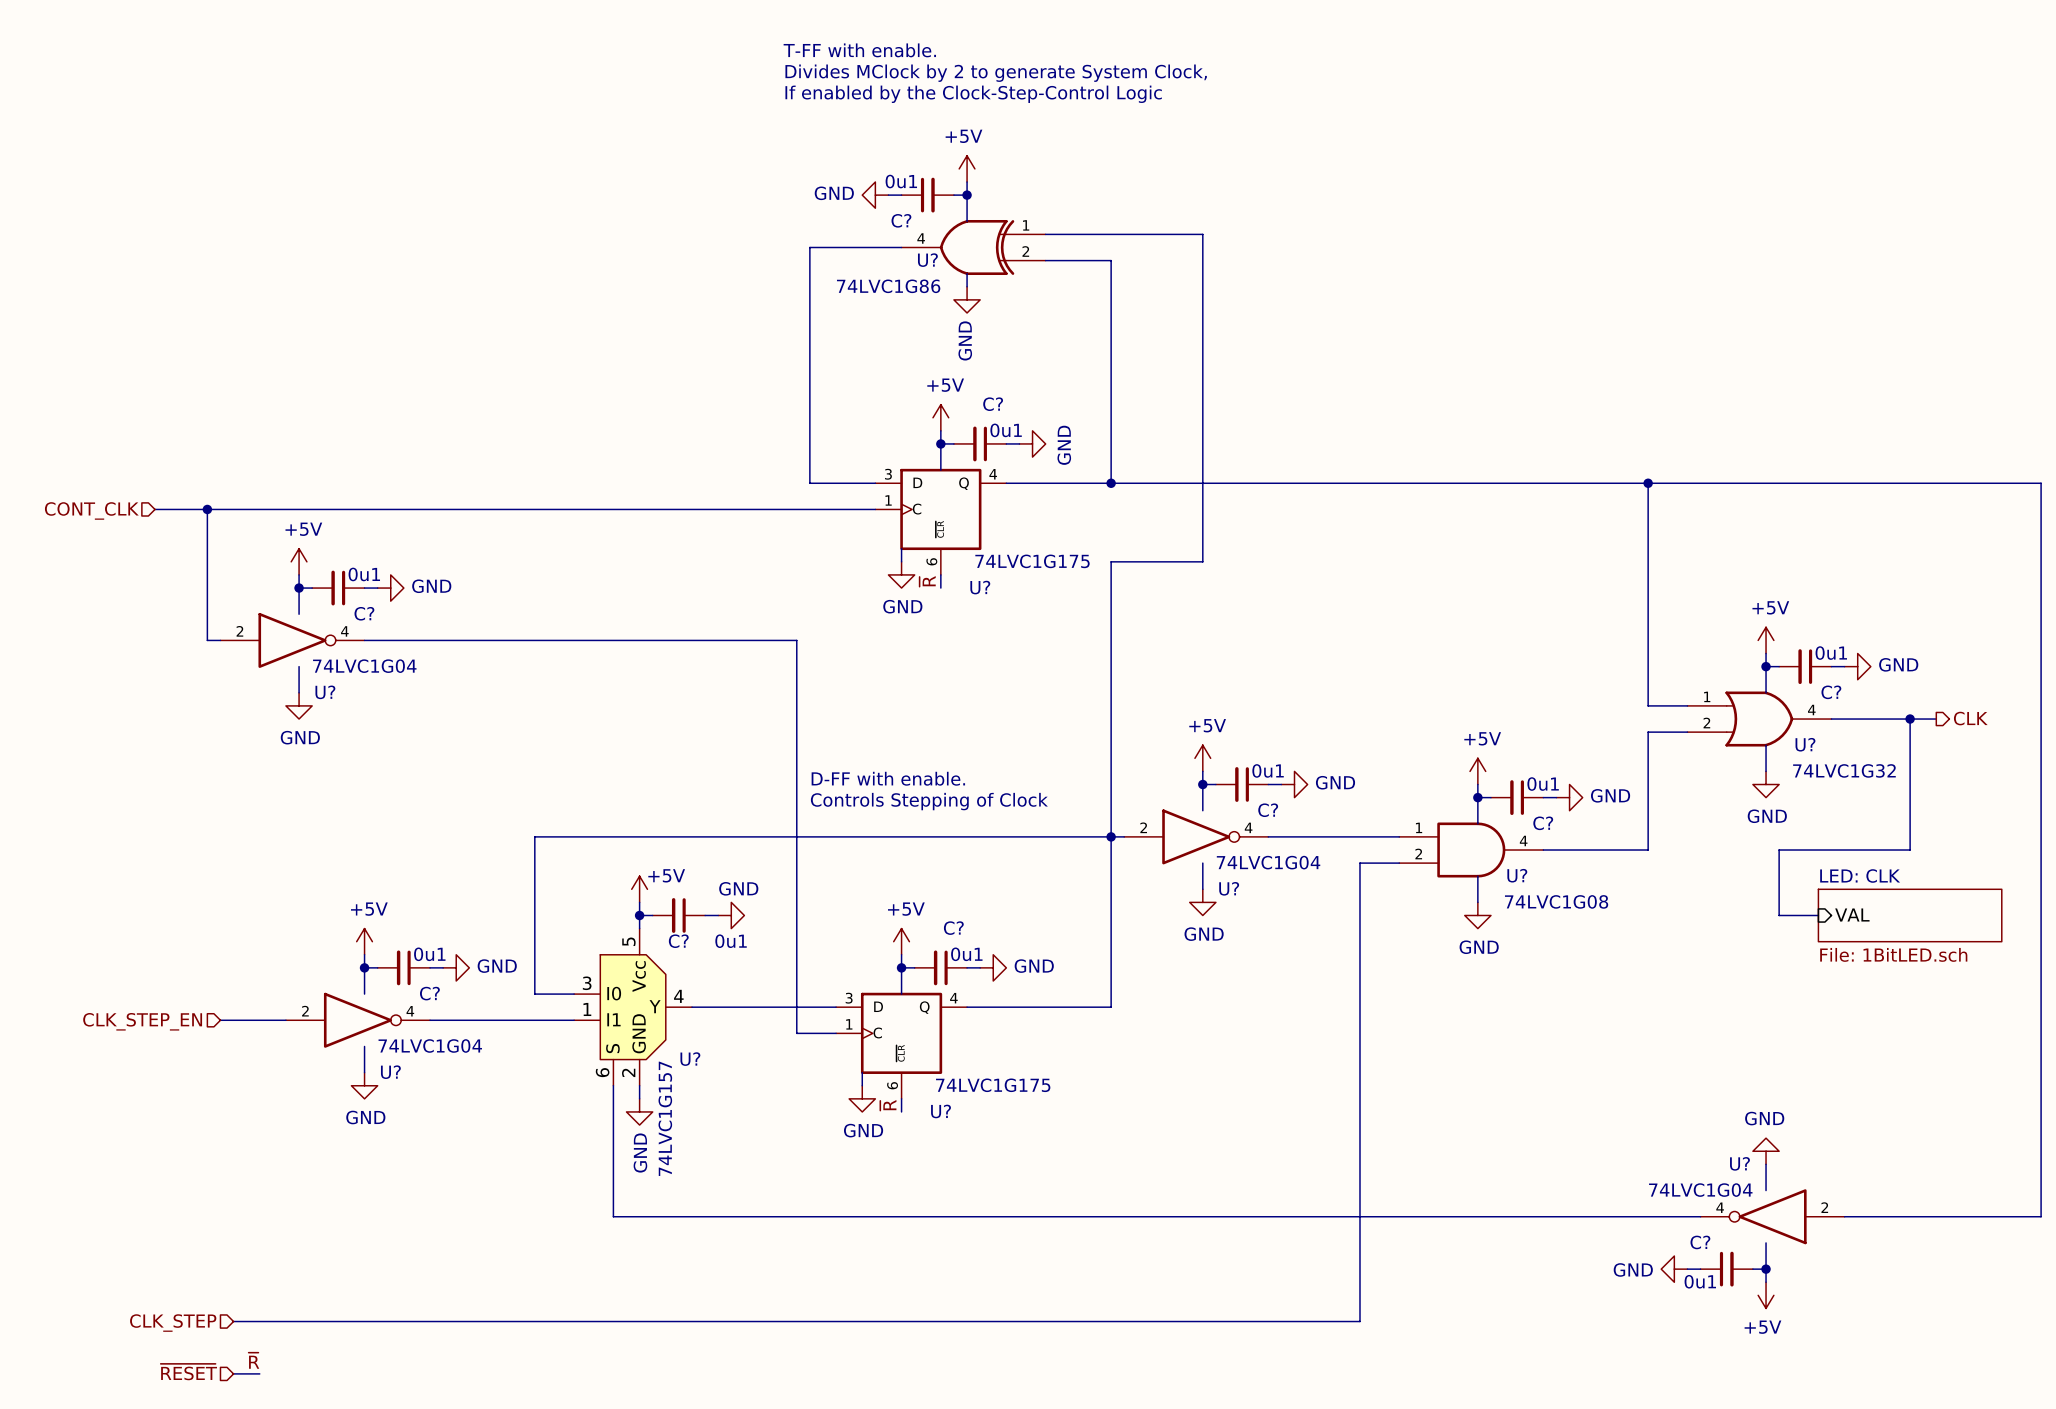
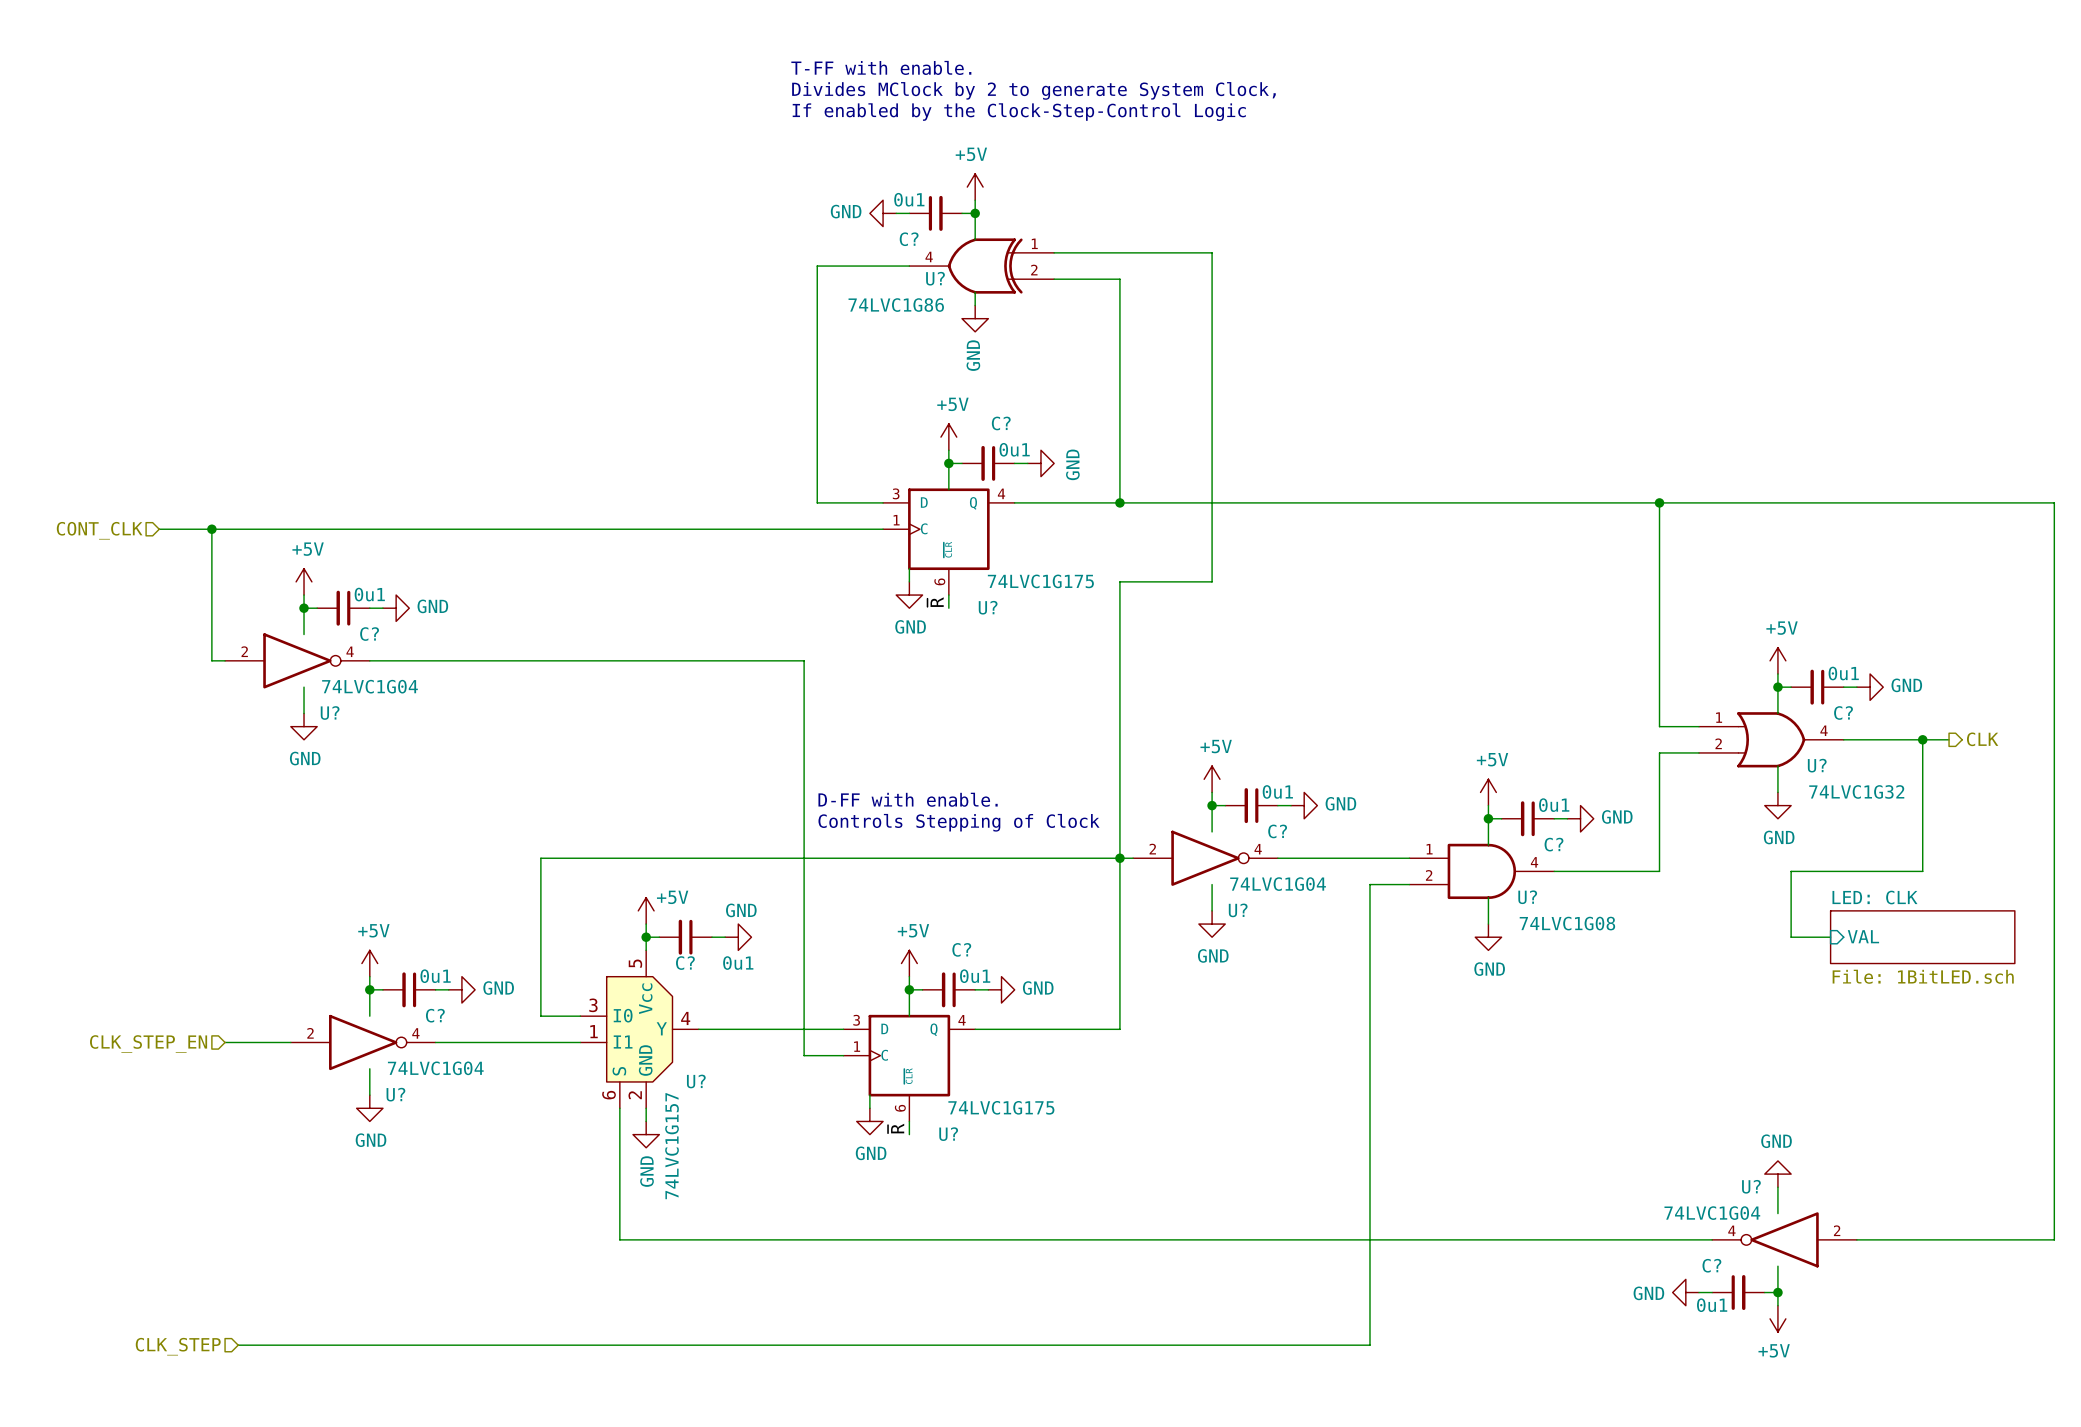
label: ~{R} (253, 1360) -> none
hierarchical label: ~{RESET} (188, 1372) -> none
wire: (233, 1373) (259, 1373) -> none

